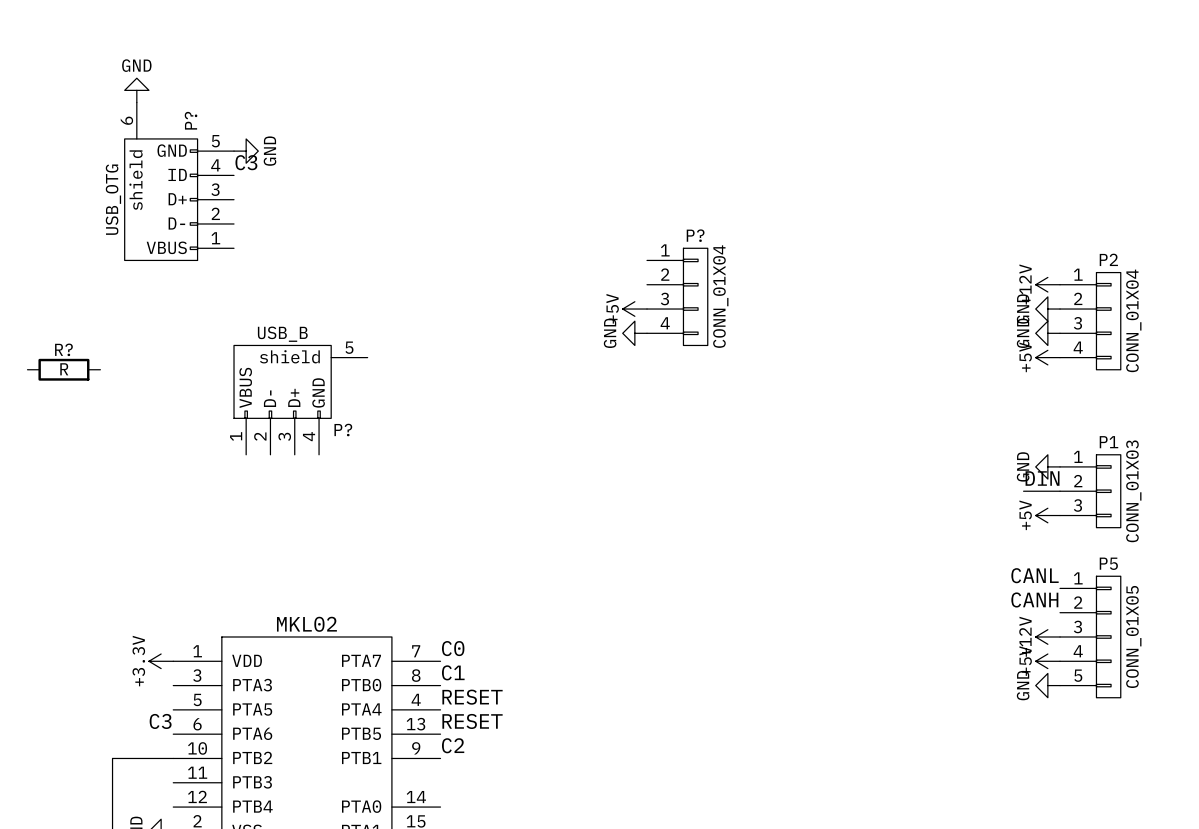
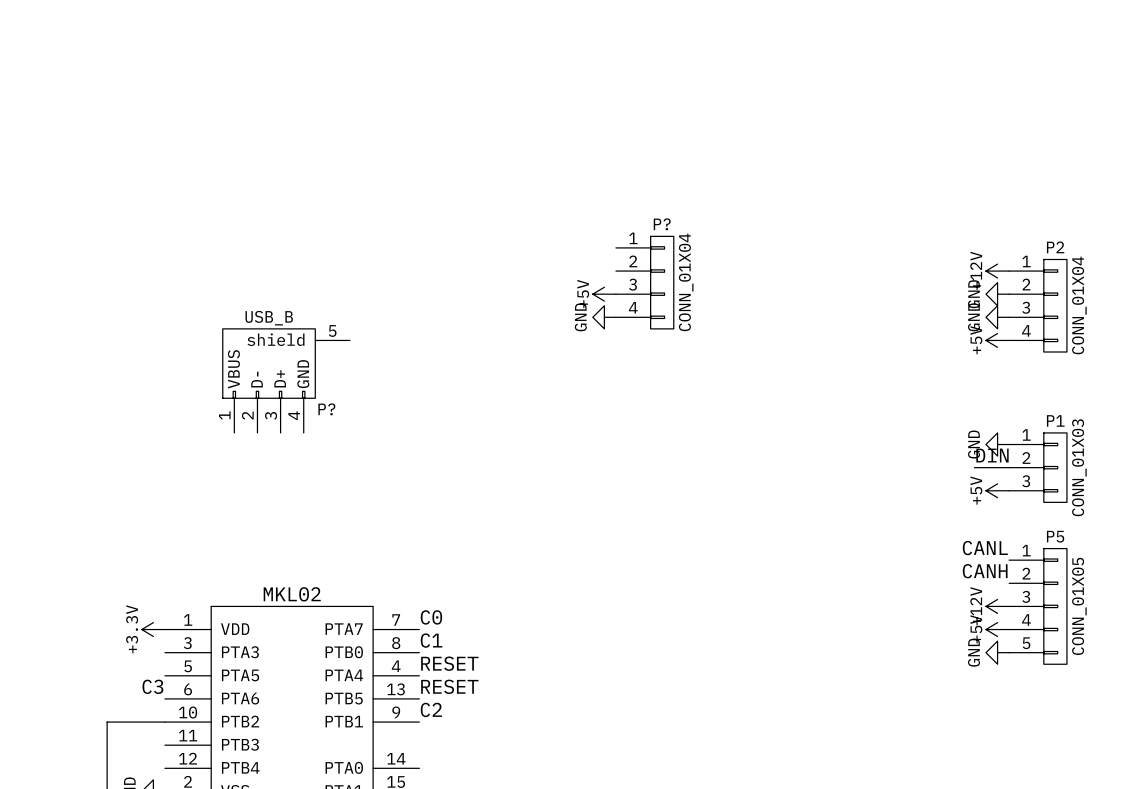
power symbol: GND (136, 90) -> none
power symbol: GND (246, 151) -> none
label: C3 (246, 162) -> none
P?: USB_OTG (179, 181) -> none
R?: R (63, 369) -> none

